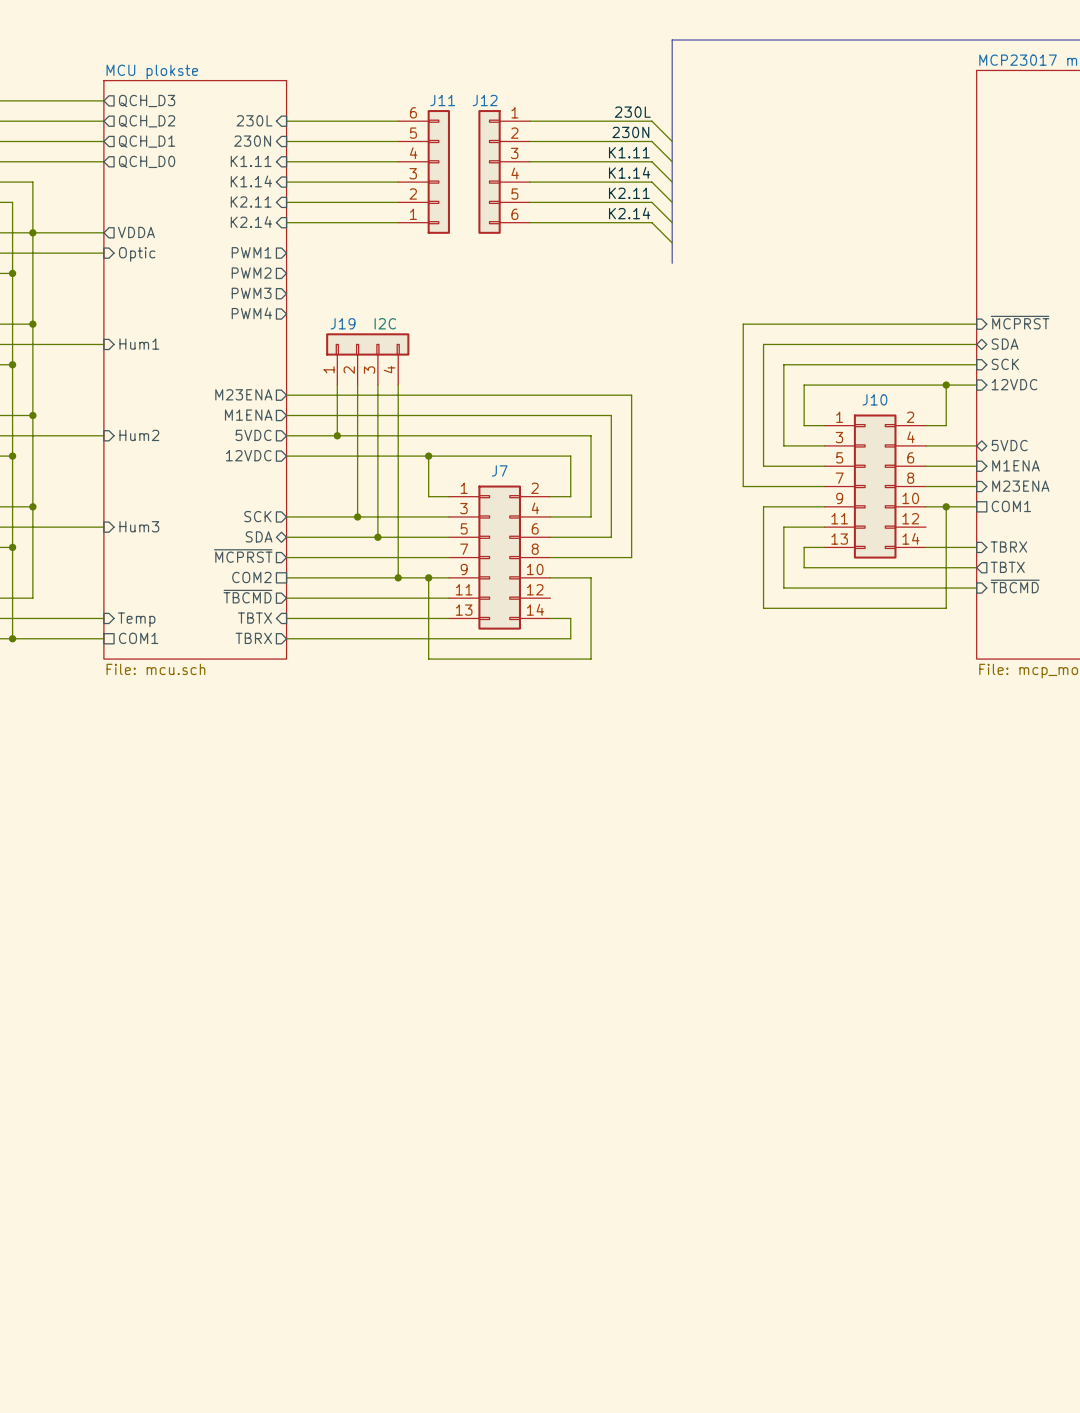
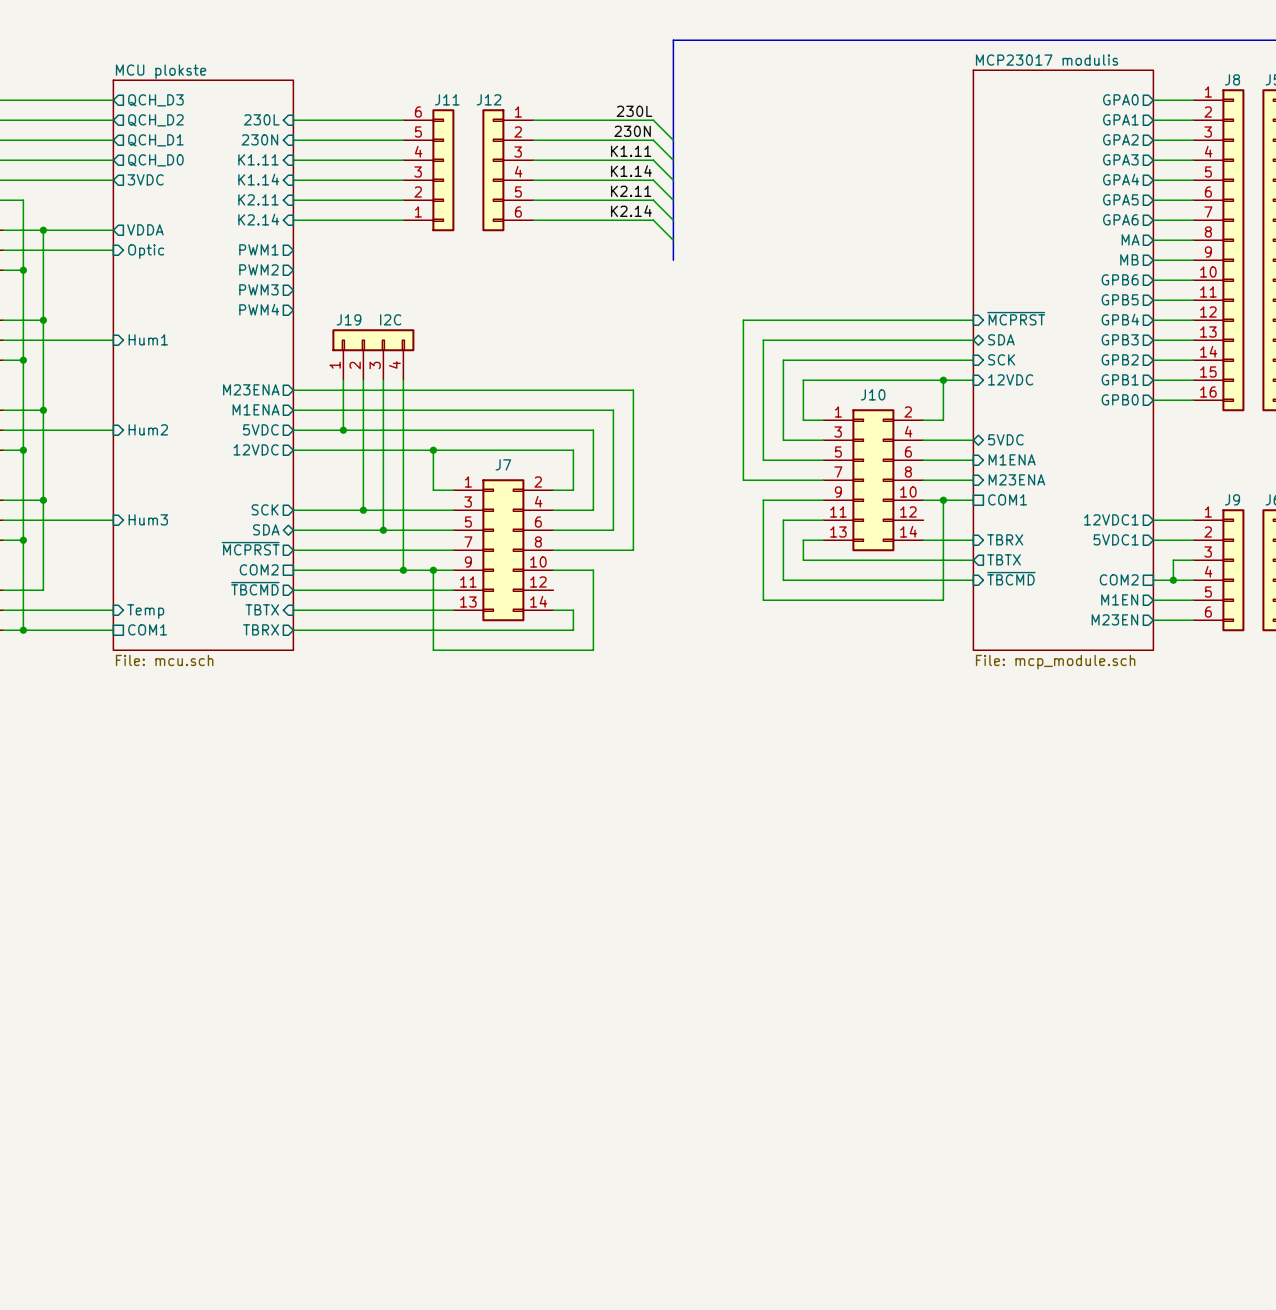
sheet pin: none -> 3VDC (145, 179)
wire: (32, 182) (32, 232) -> (43, 180) (113, 180)

